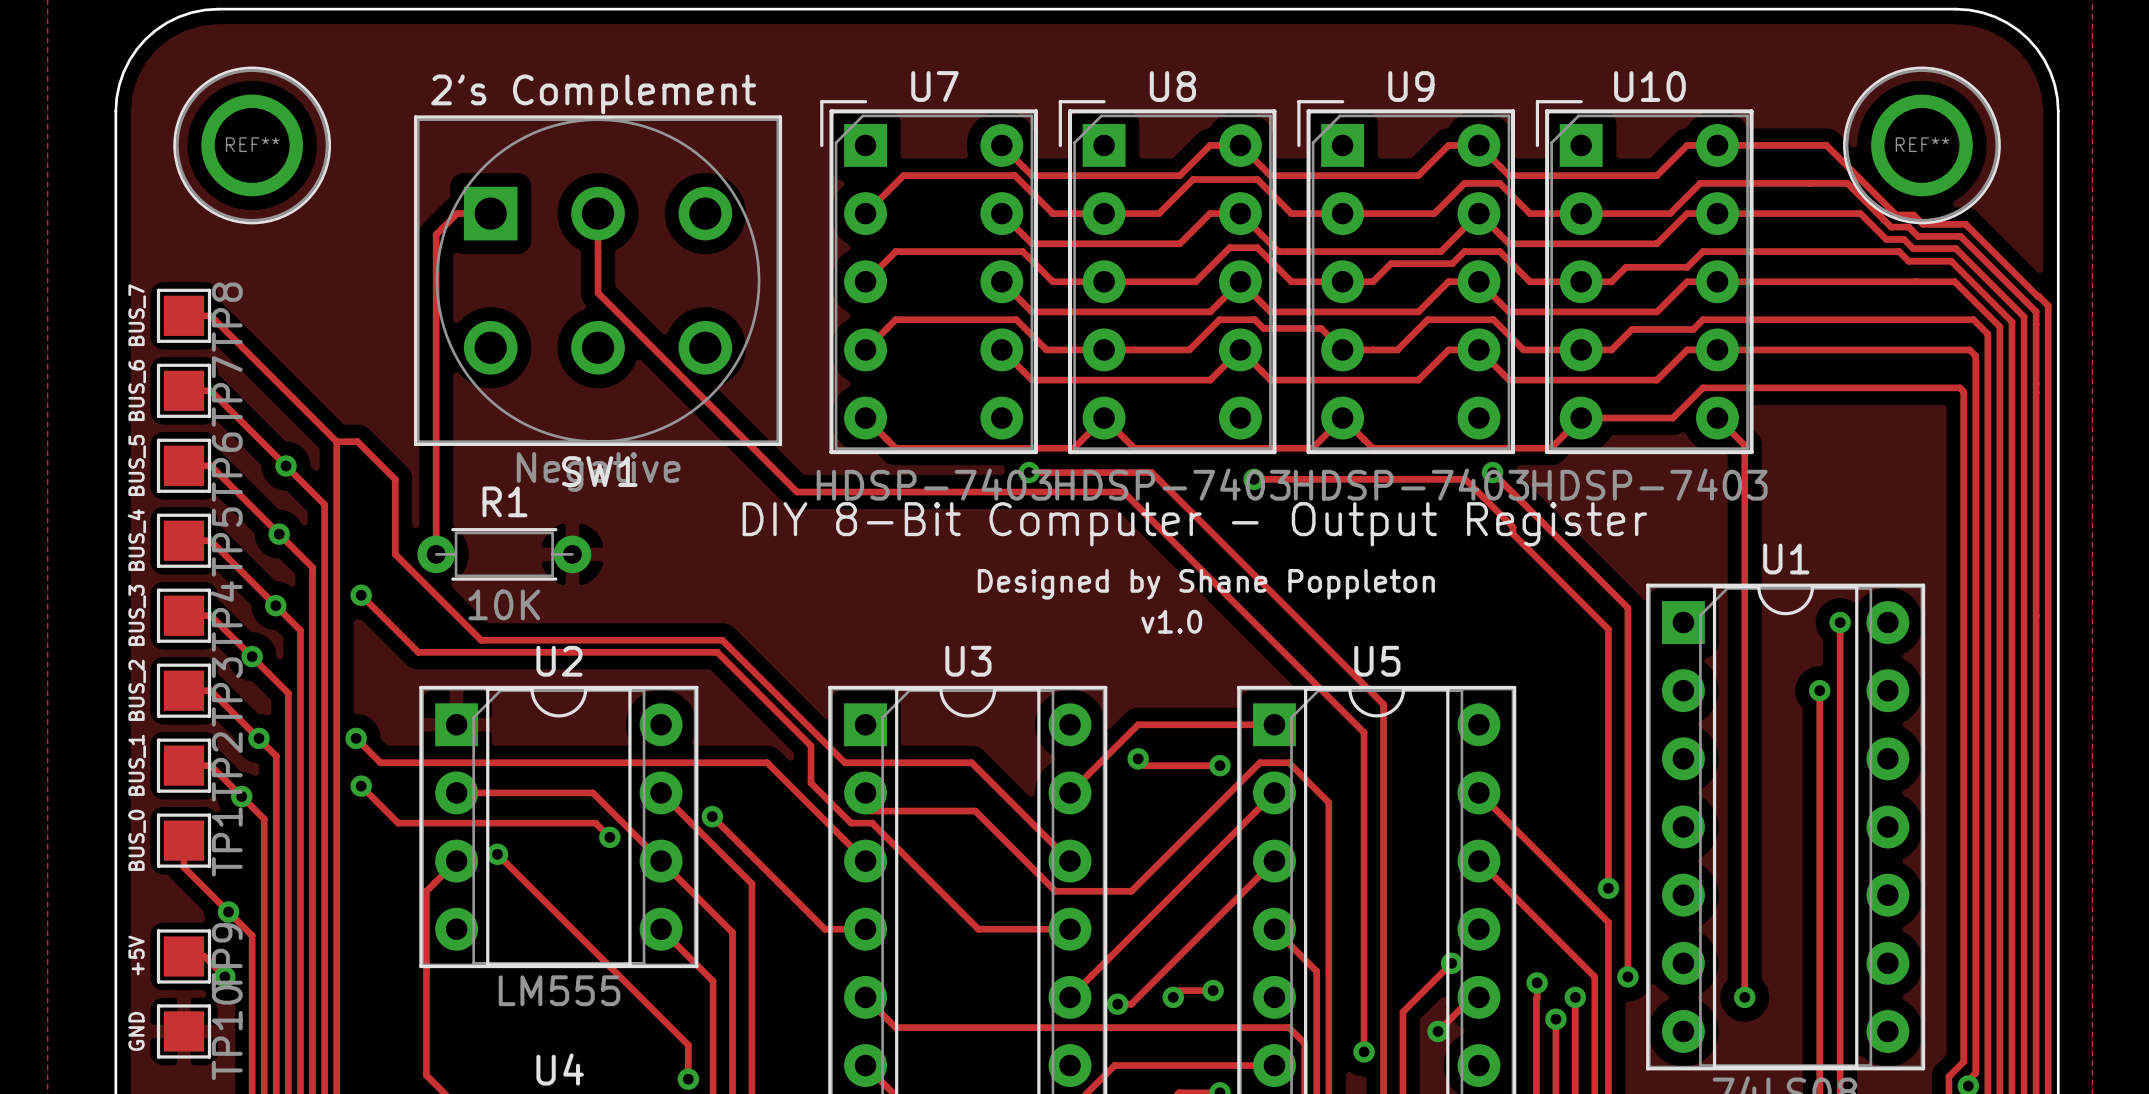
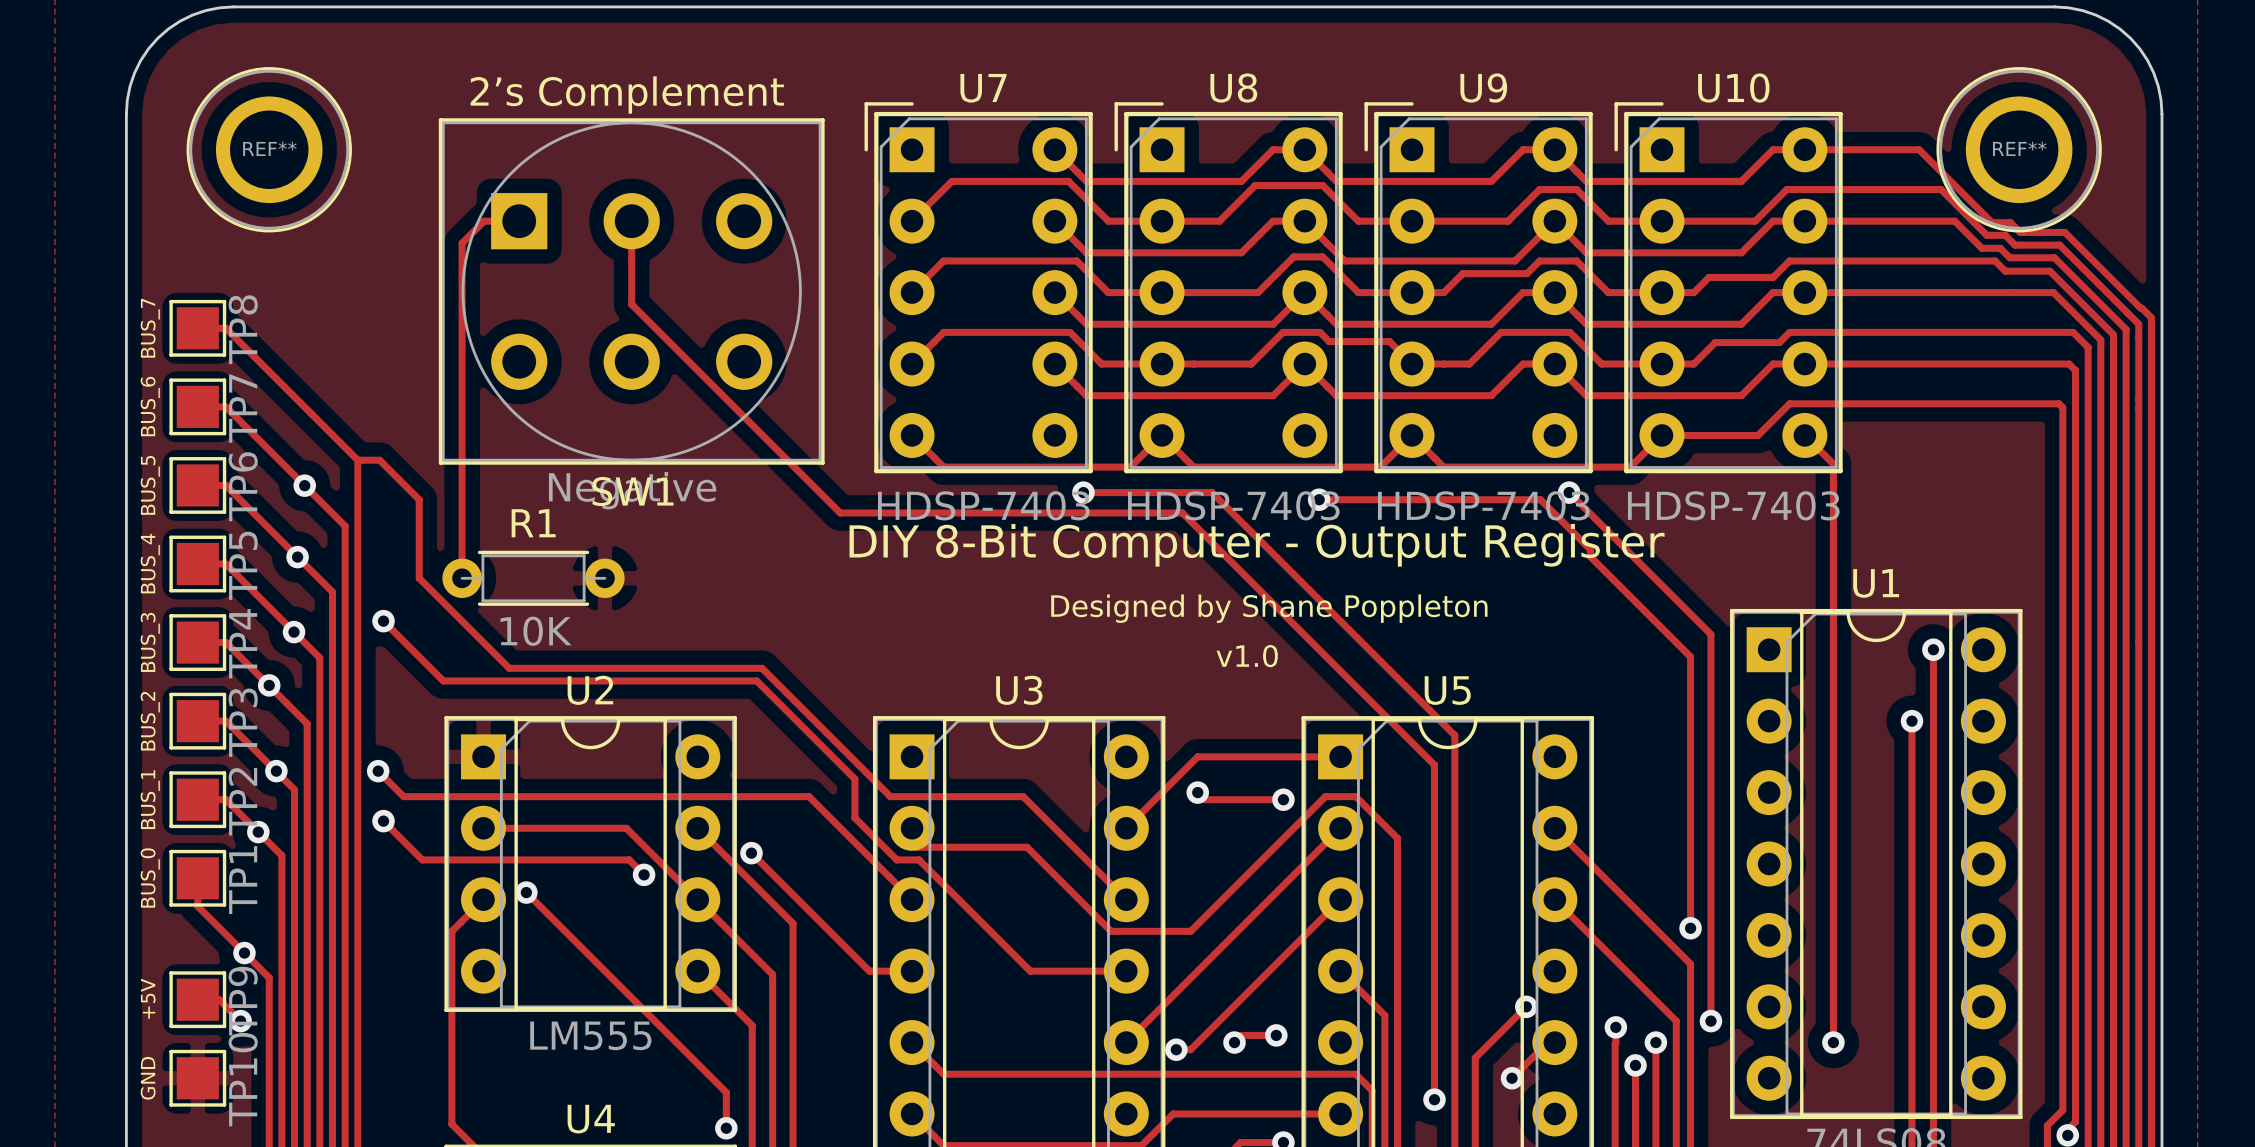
text position: v1.0 (1171, 621) -> v1.0 (1247, 656)

